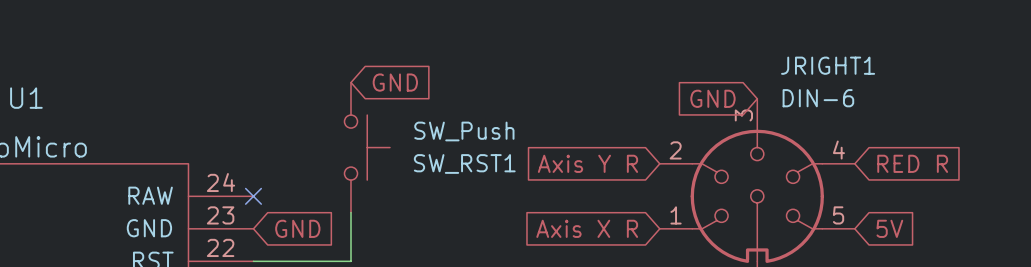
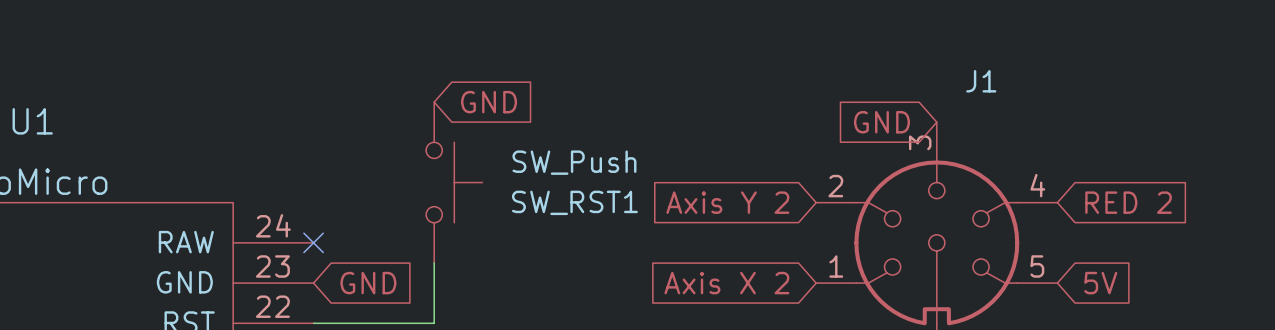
JRIGHT1 name: JRIGHT1 (828, 65) -> J1 (981, 81)
JRIGHT1 value: DIN-6 (818, 98) -> none
global label: Axis Y R (587, 163) -> Axis Y 2 (727, 202)
global label: RED R (912, 163) -> RED 2 (1128, 202)
global label: Axis X R (587, 228) -> Axis X 2 (726, 283)

